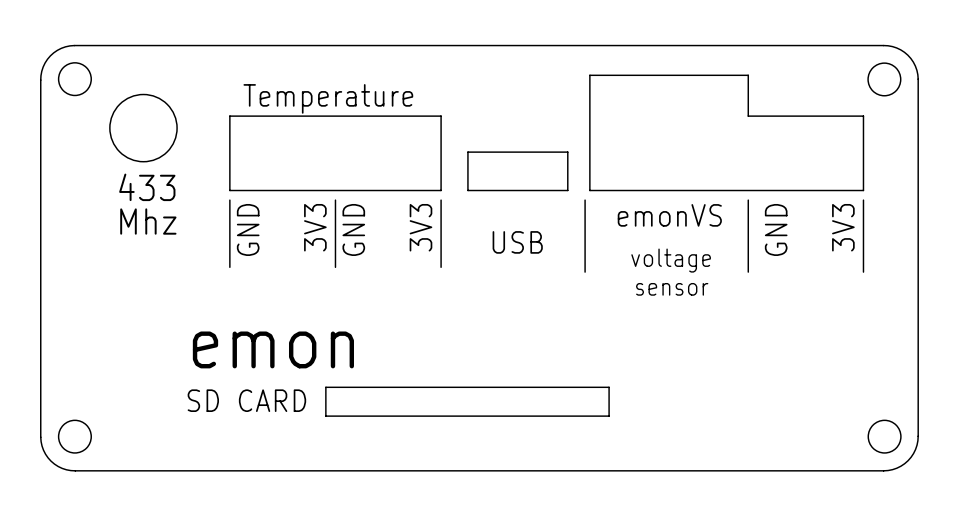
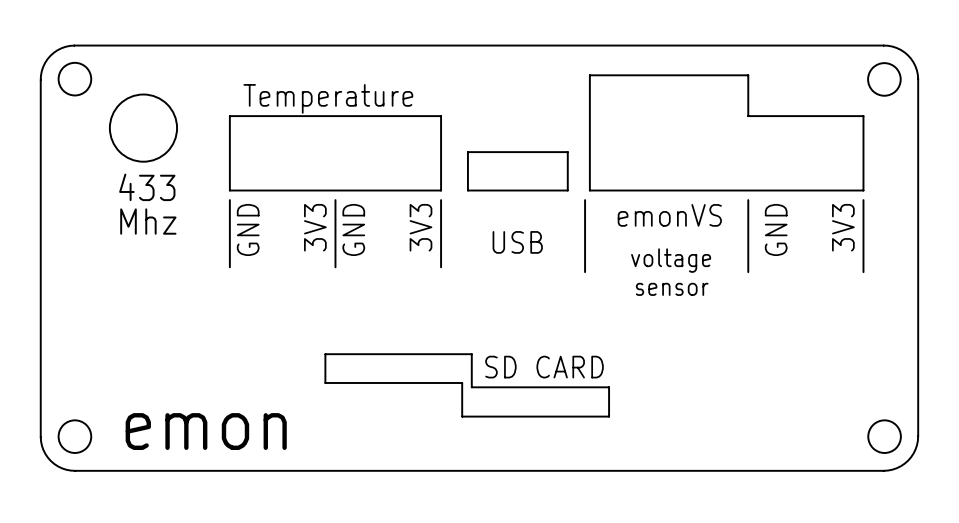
text position: emon (273, 349) -> emon (206, 431)
text: none -> SD CARD (544, 367)
board edge: (471, 387) (325, 387) (325, 416) (609, 416) -> (471, 387) (471, 354) (325, 354) (325, 382) (462, 382) (462, 416) (609, 416)
text: SD CARD (246, 400) -> none

